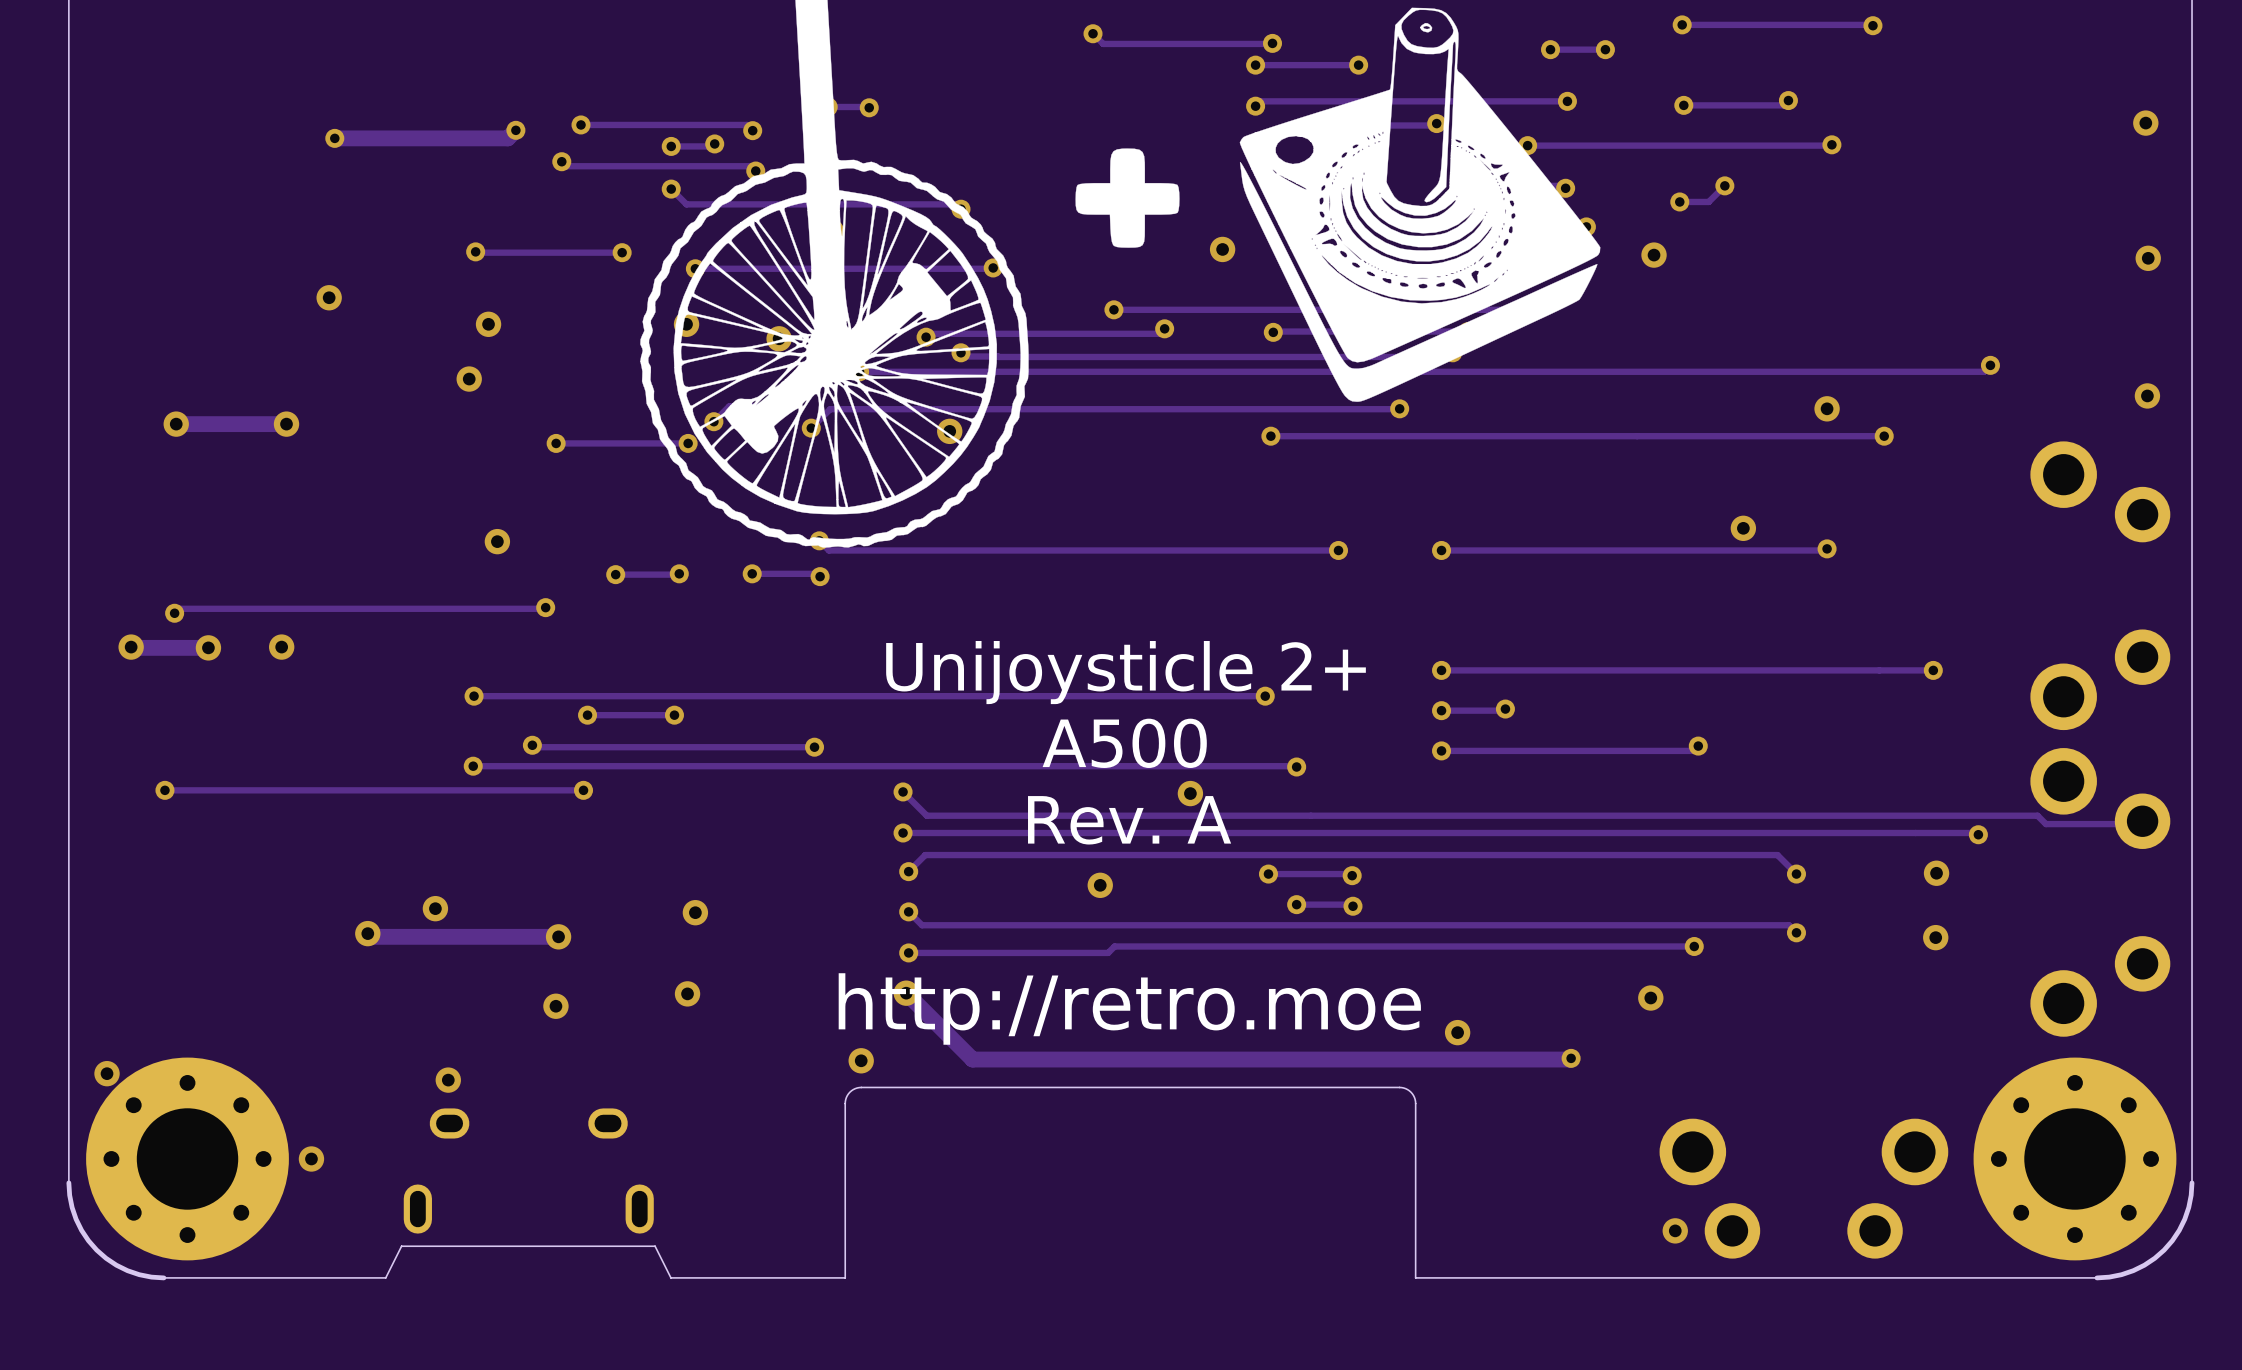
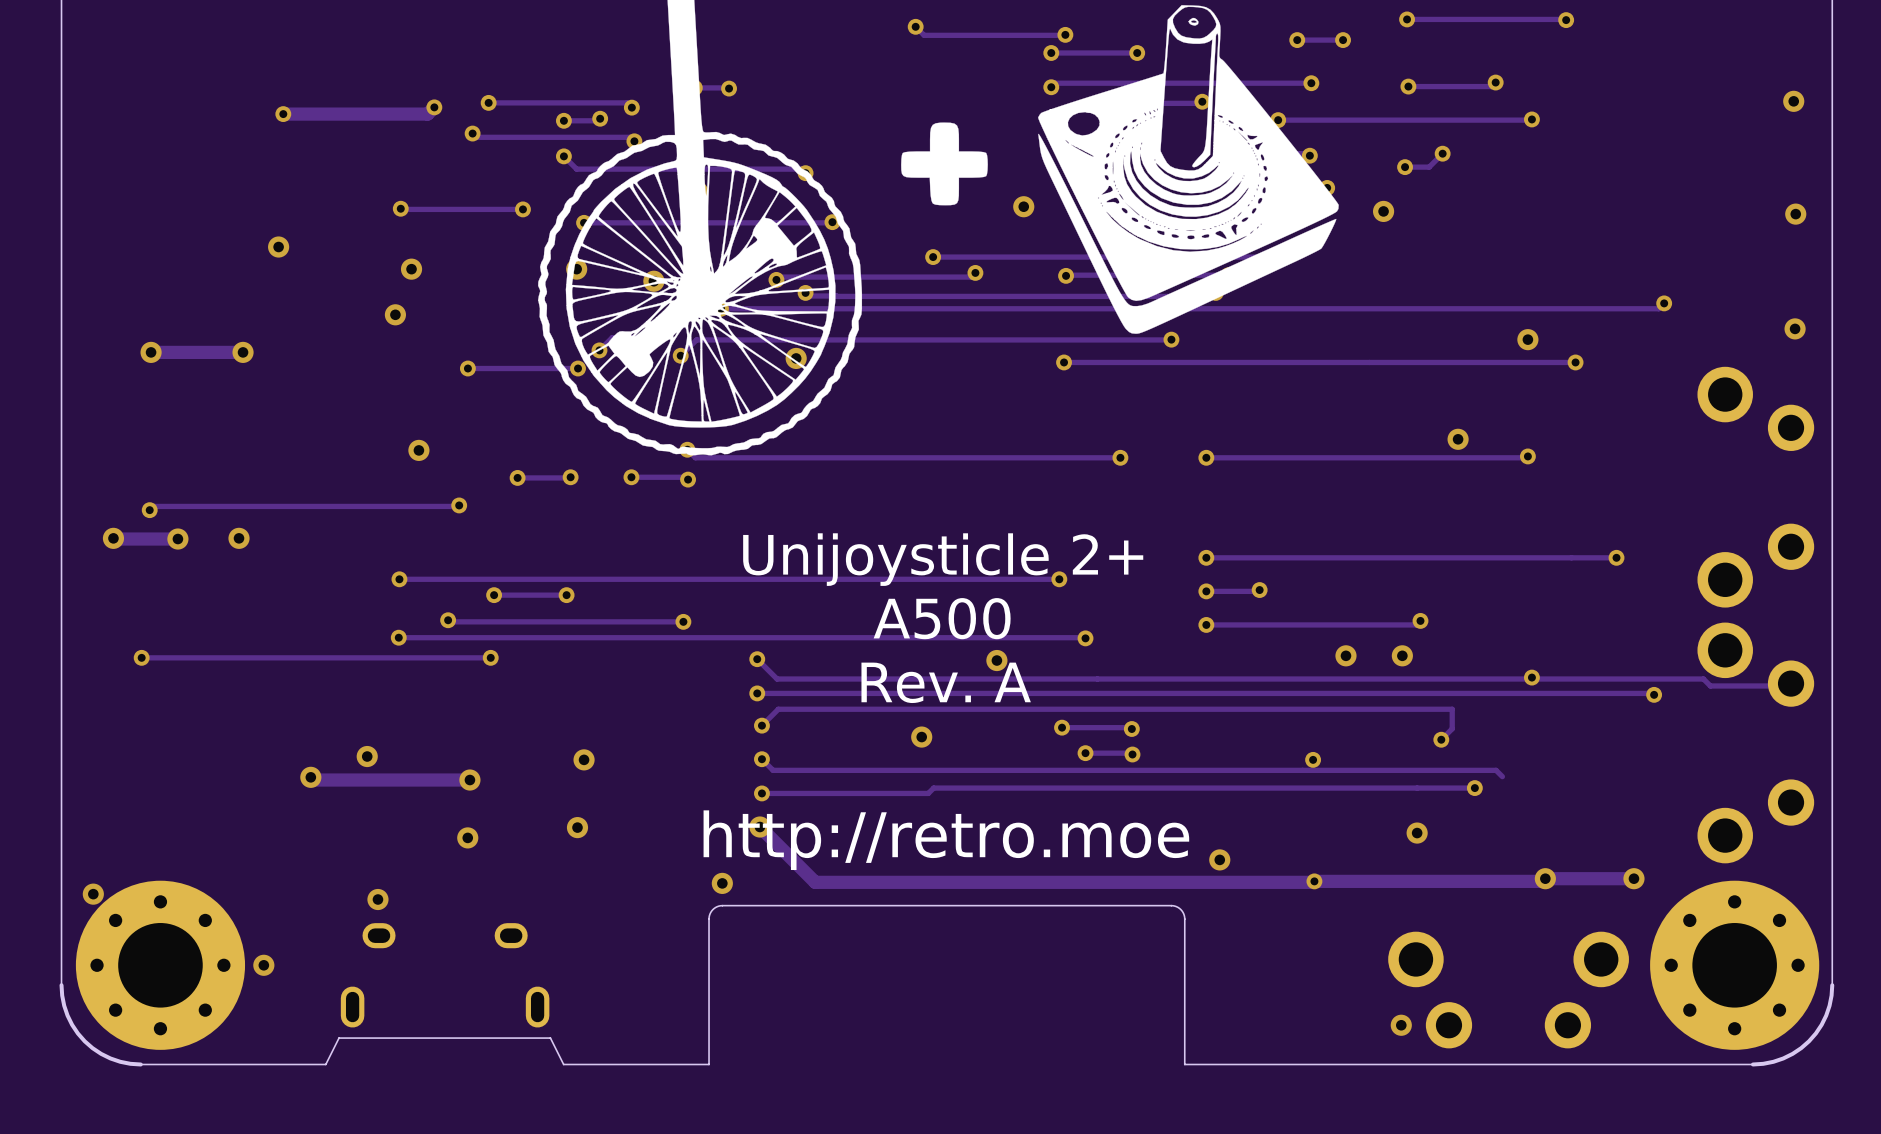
via: none -> (1345, 655)
via: none -> (1402, 655)
via: none -> (1531, 677)
track: (925, 855) (1777, 855) (1796, 874) -> (775, 711) (778, 709) (1452, 709) (1452, 728) (1441, 739)
via: (1936, 873) -> none
via: (1796, 874) -> none
via: none -> (1441, 739)
via: none -> (1313, 759)
via: (1796, 932) -> none
via: (1935, 937) -> none
via: (1694, 946) -> none
track: none -> (1474, 788) (1417, 788)
via: none -> (1474, 788)
via position: (1650, 998) -> (1417, 833)
via: none -> (1545, 878)
track: none -> (1633, 878) (1545, 878) (1542, 881) (1314, 881)
via: none -> (1633, 878)

